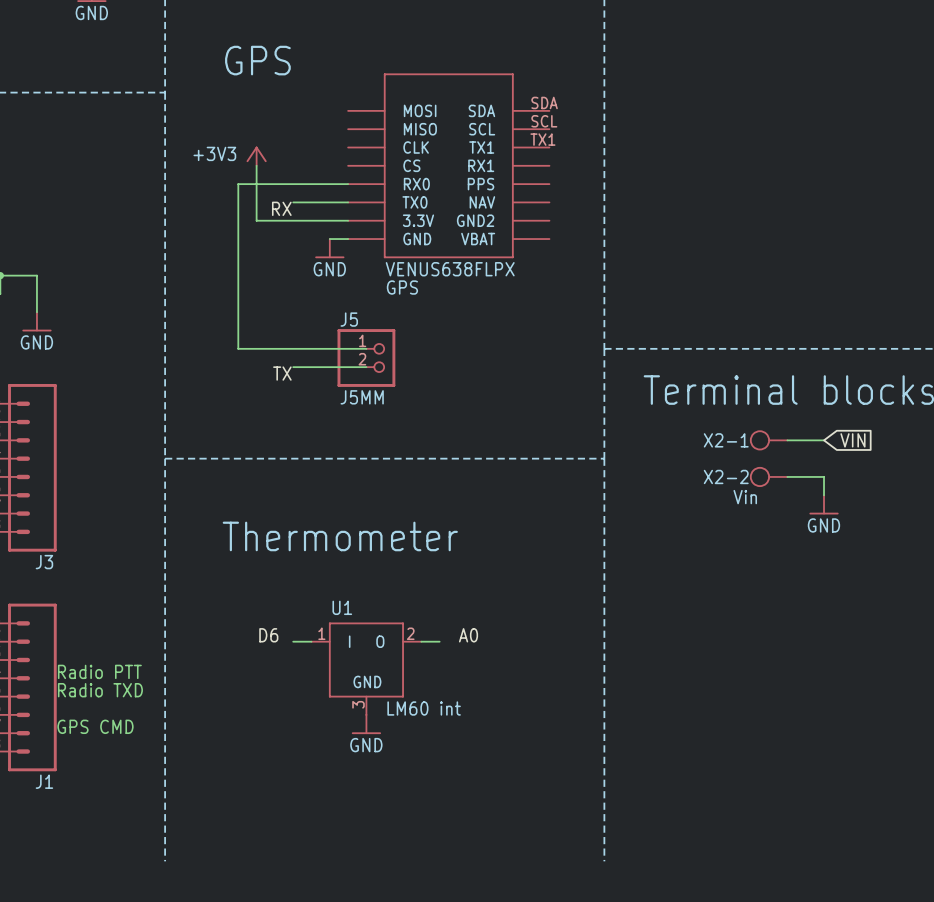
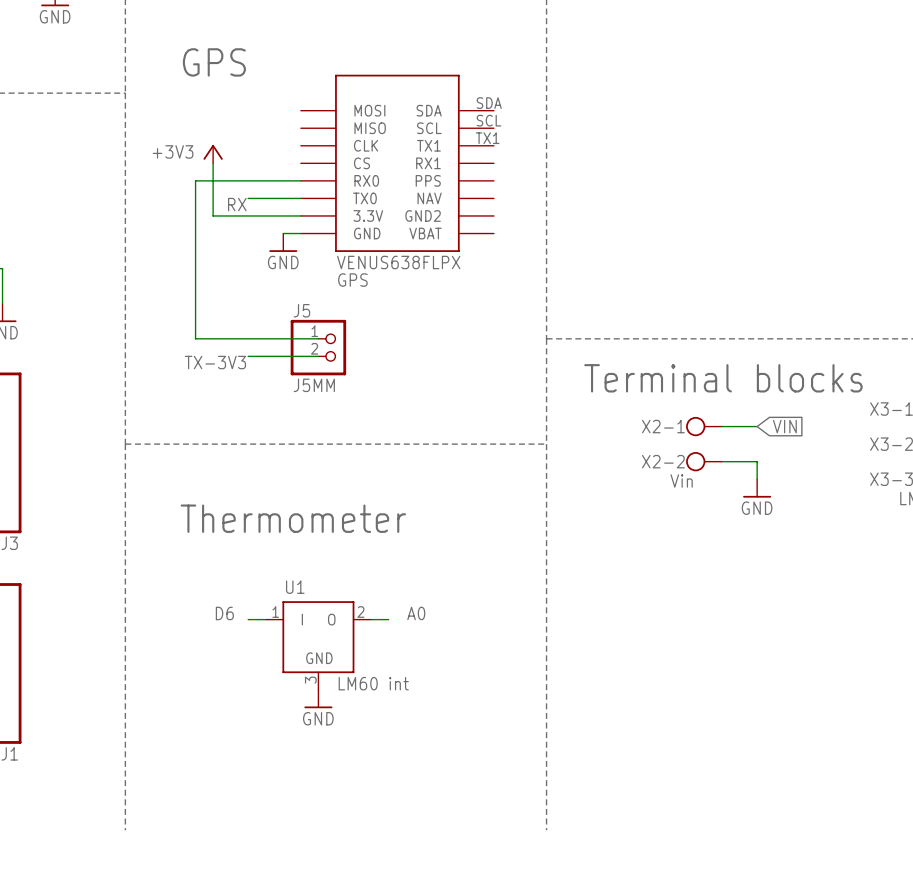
label: TX (282, 373) -> TX-3V3 (215, 362)
text: Radio PTT (99, 671) -> none
text: Radio TXD (100, 690) -> none
text: GPS CMD (95, 726) -> none

